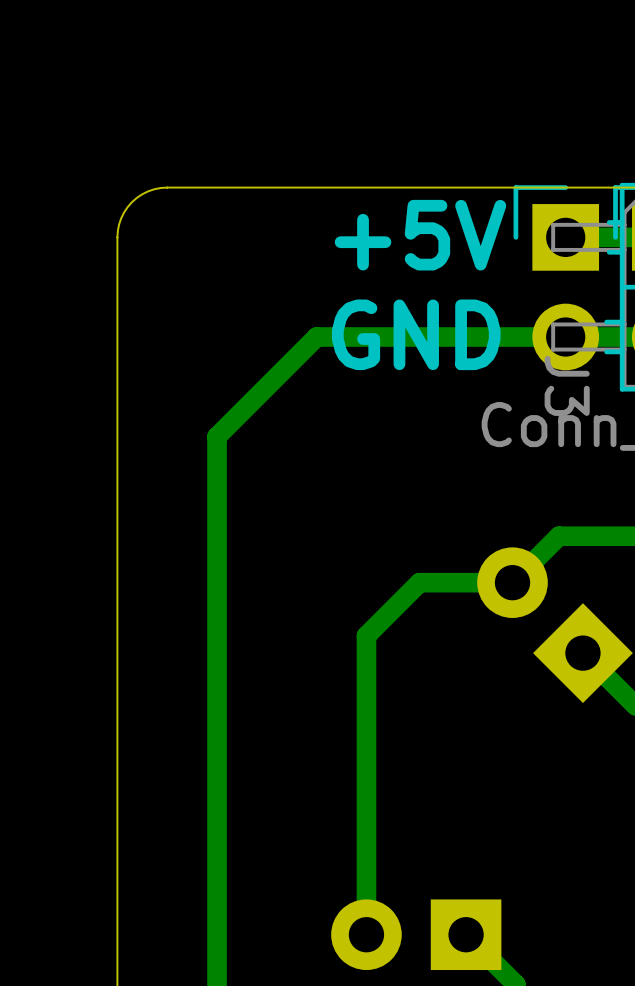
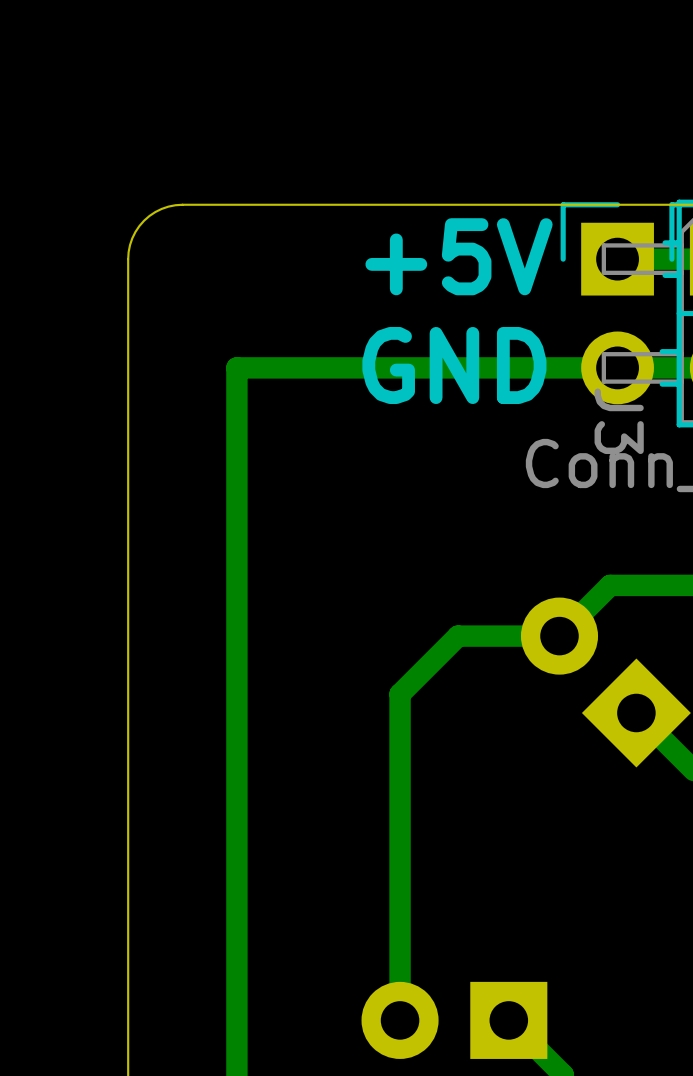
bottom track: (316, 337) (217, 436) -> (345, 367) (236, 367) (236, 476)

